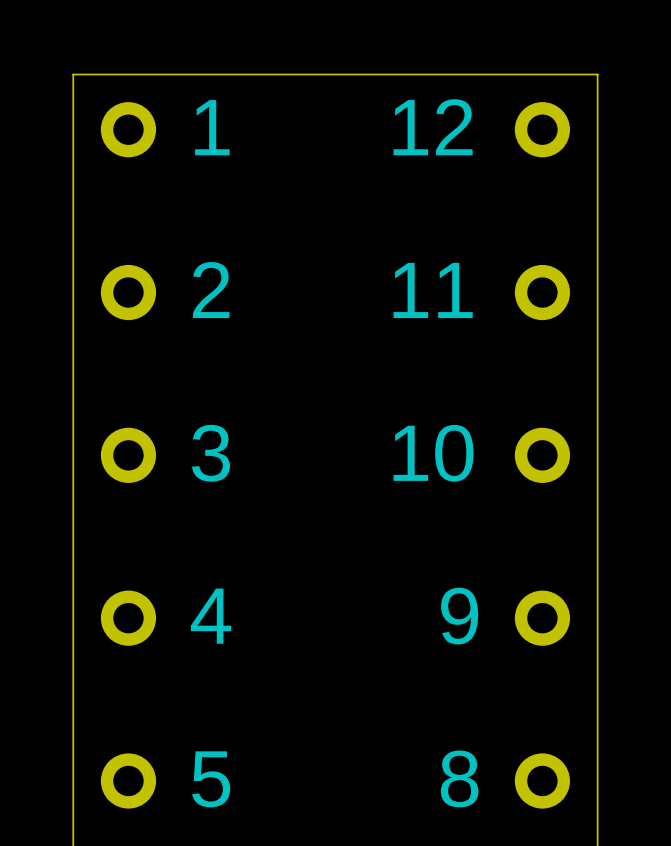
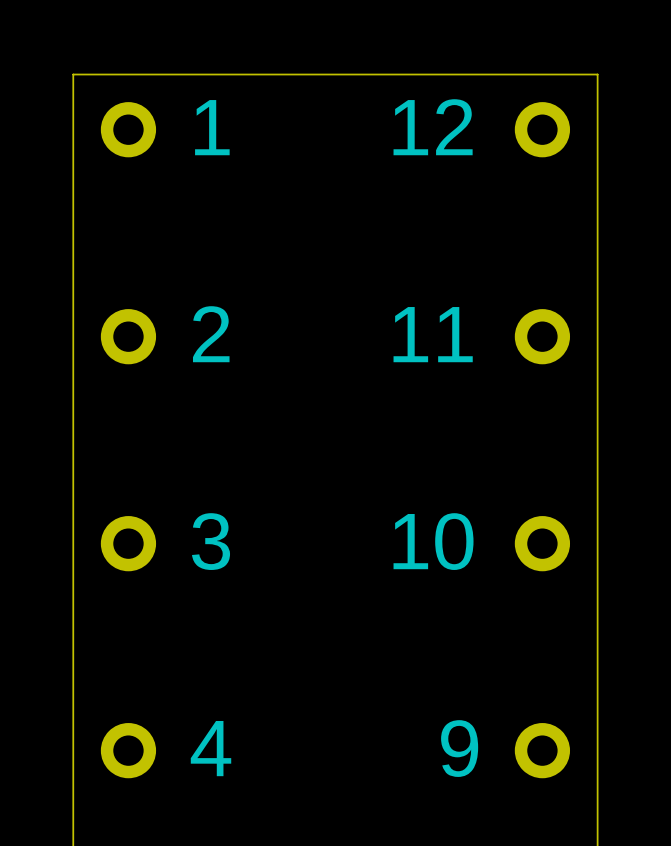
part position: (128, 292) -> (128, 336)
part position: (542, 292) -> (542, 336)
part position: (128, 455) -> (128, 543)
part position: (542, 455) -> (542, 543)
part position: (128, 618) -> (128, 750)
part position: (542, 618) -> (542, 750)
part: 5 (128, 780) -> none
part: 8 (542, 780) -> none

